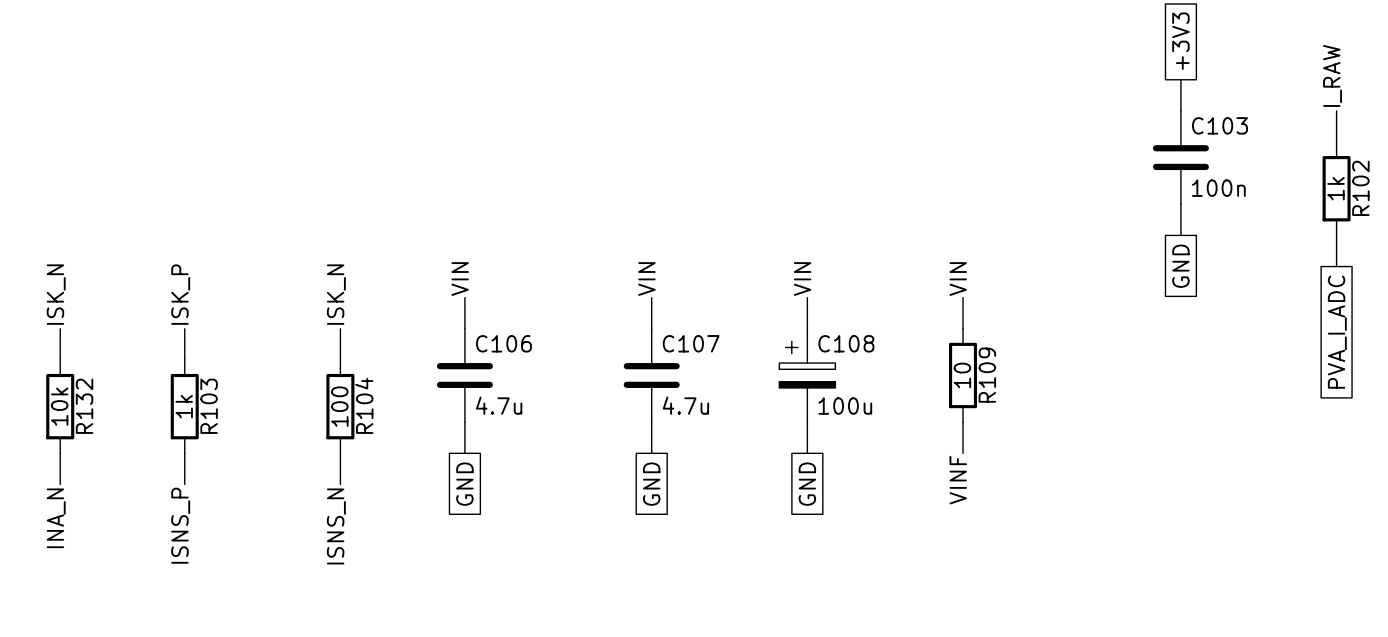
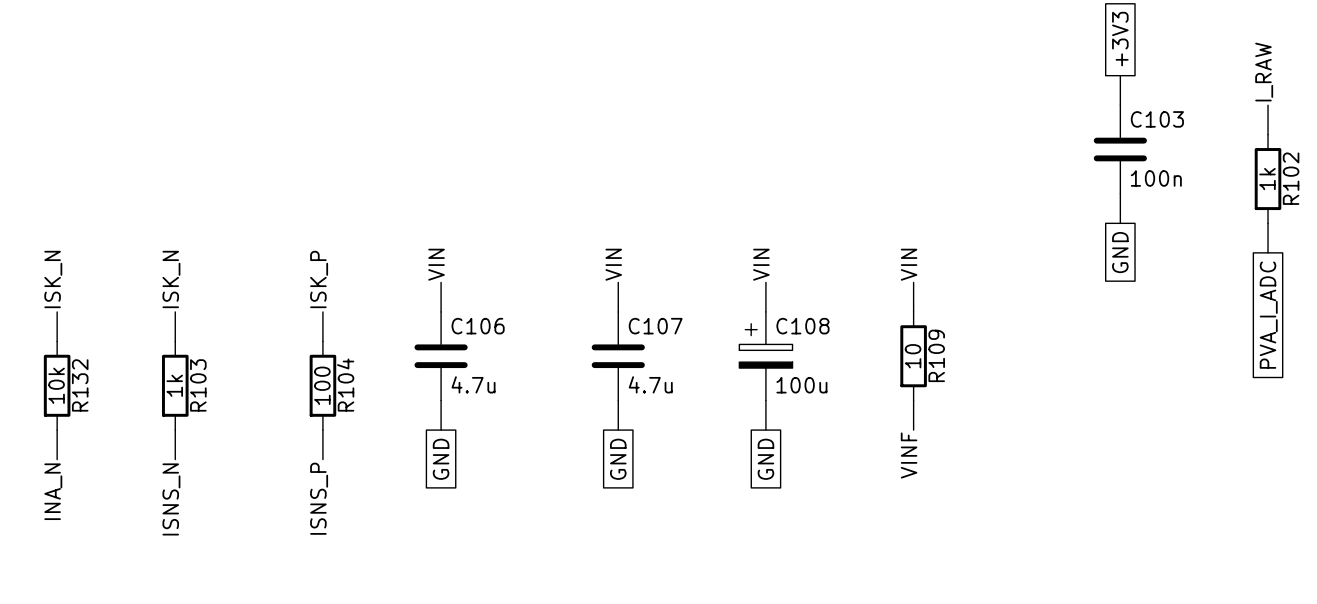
label: ISK_P (180, 294) -> ISK_N (171, 279)
label: ISK_N (336, 294) -> ISK_P (319, 279)
label: ISNS_P (180, 525) -> ISNS_N (171, 499)
label: ISNS_N (336, 526) -> ISNS_P (319, 498)

